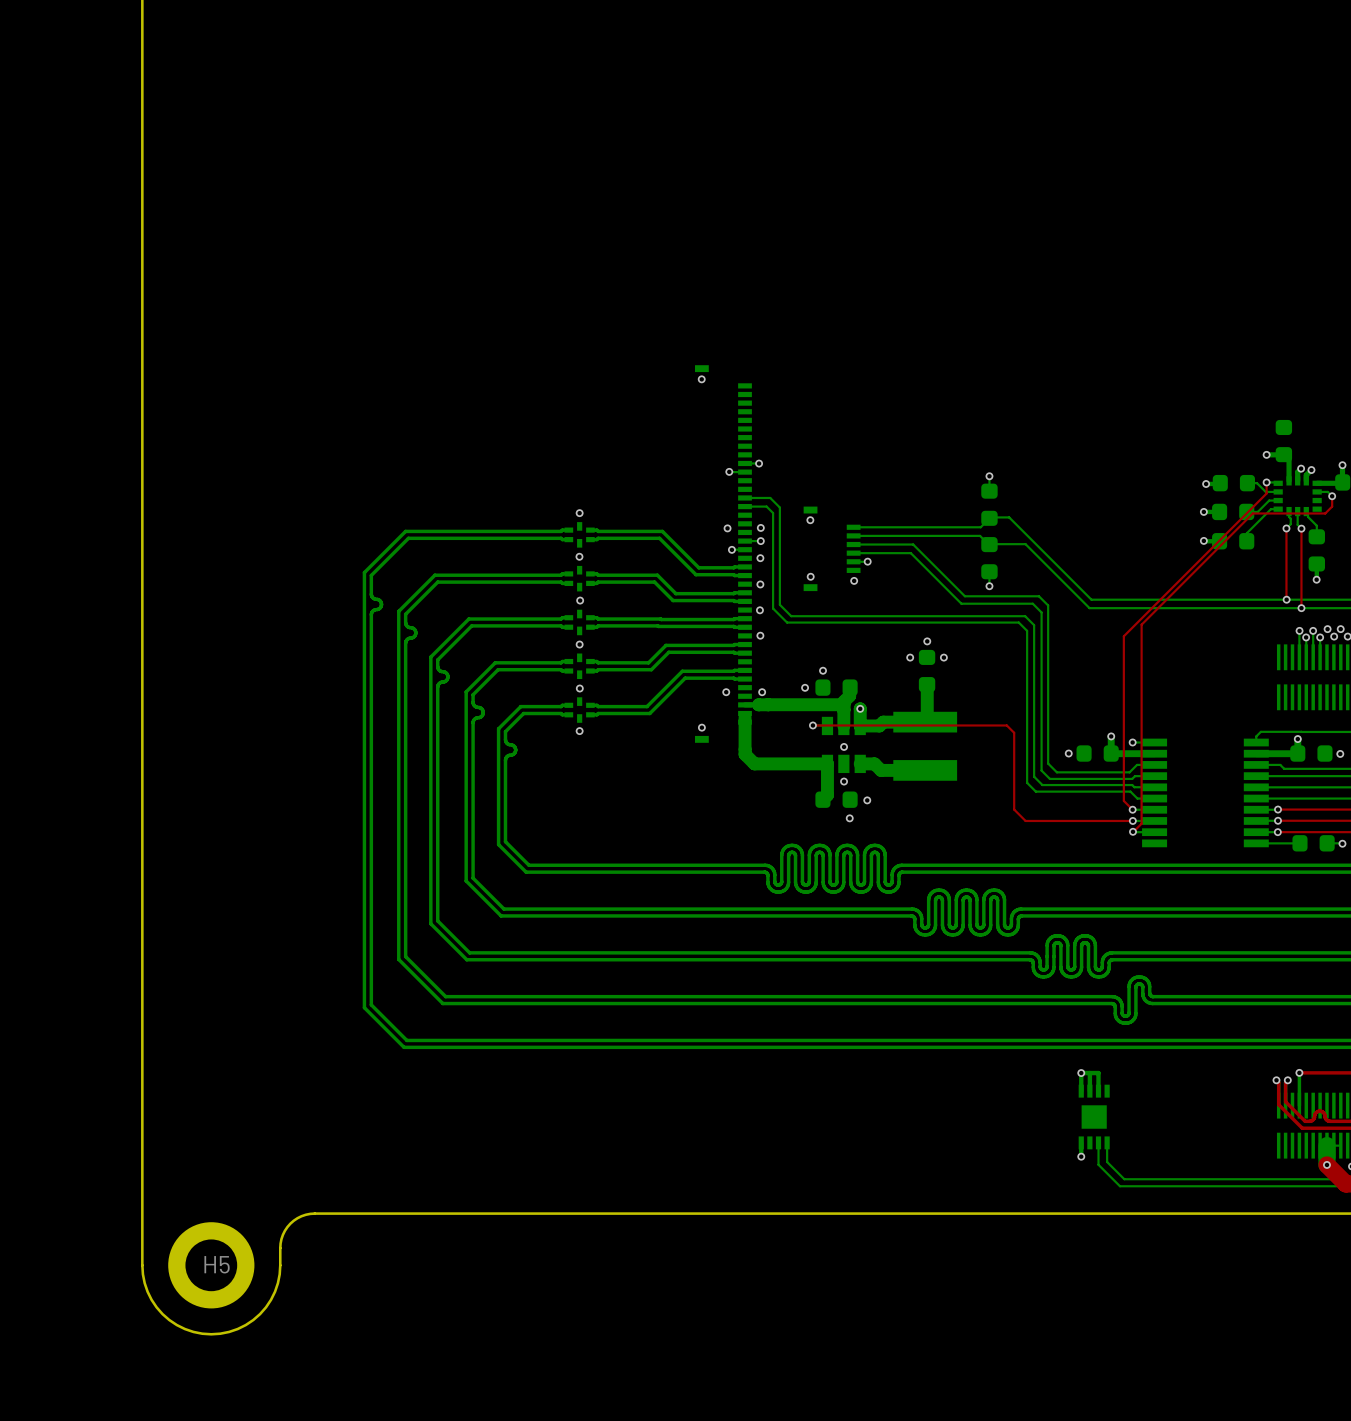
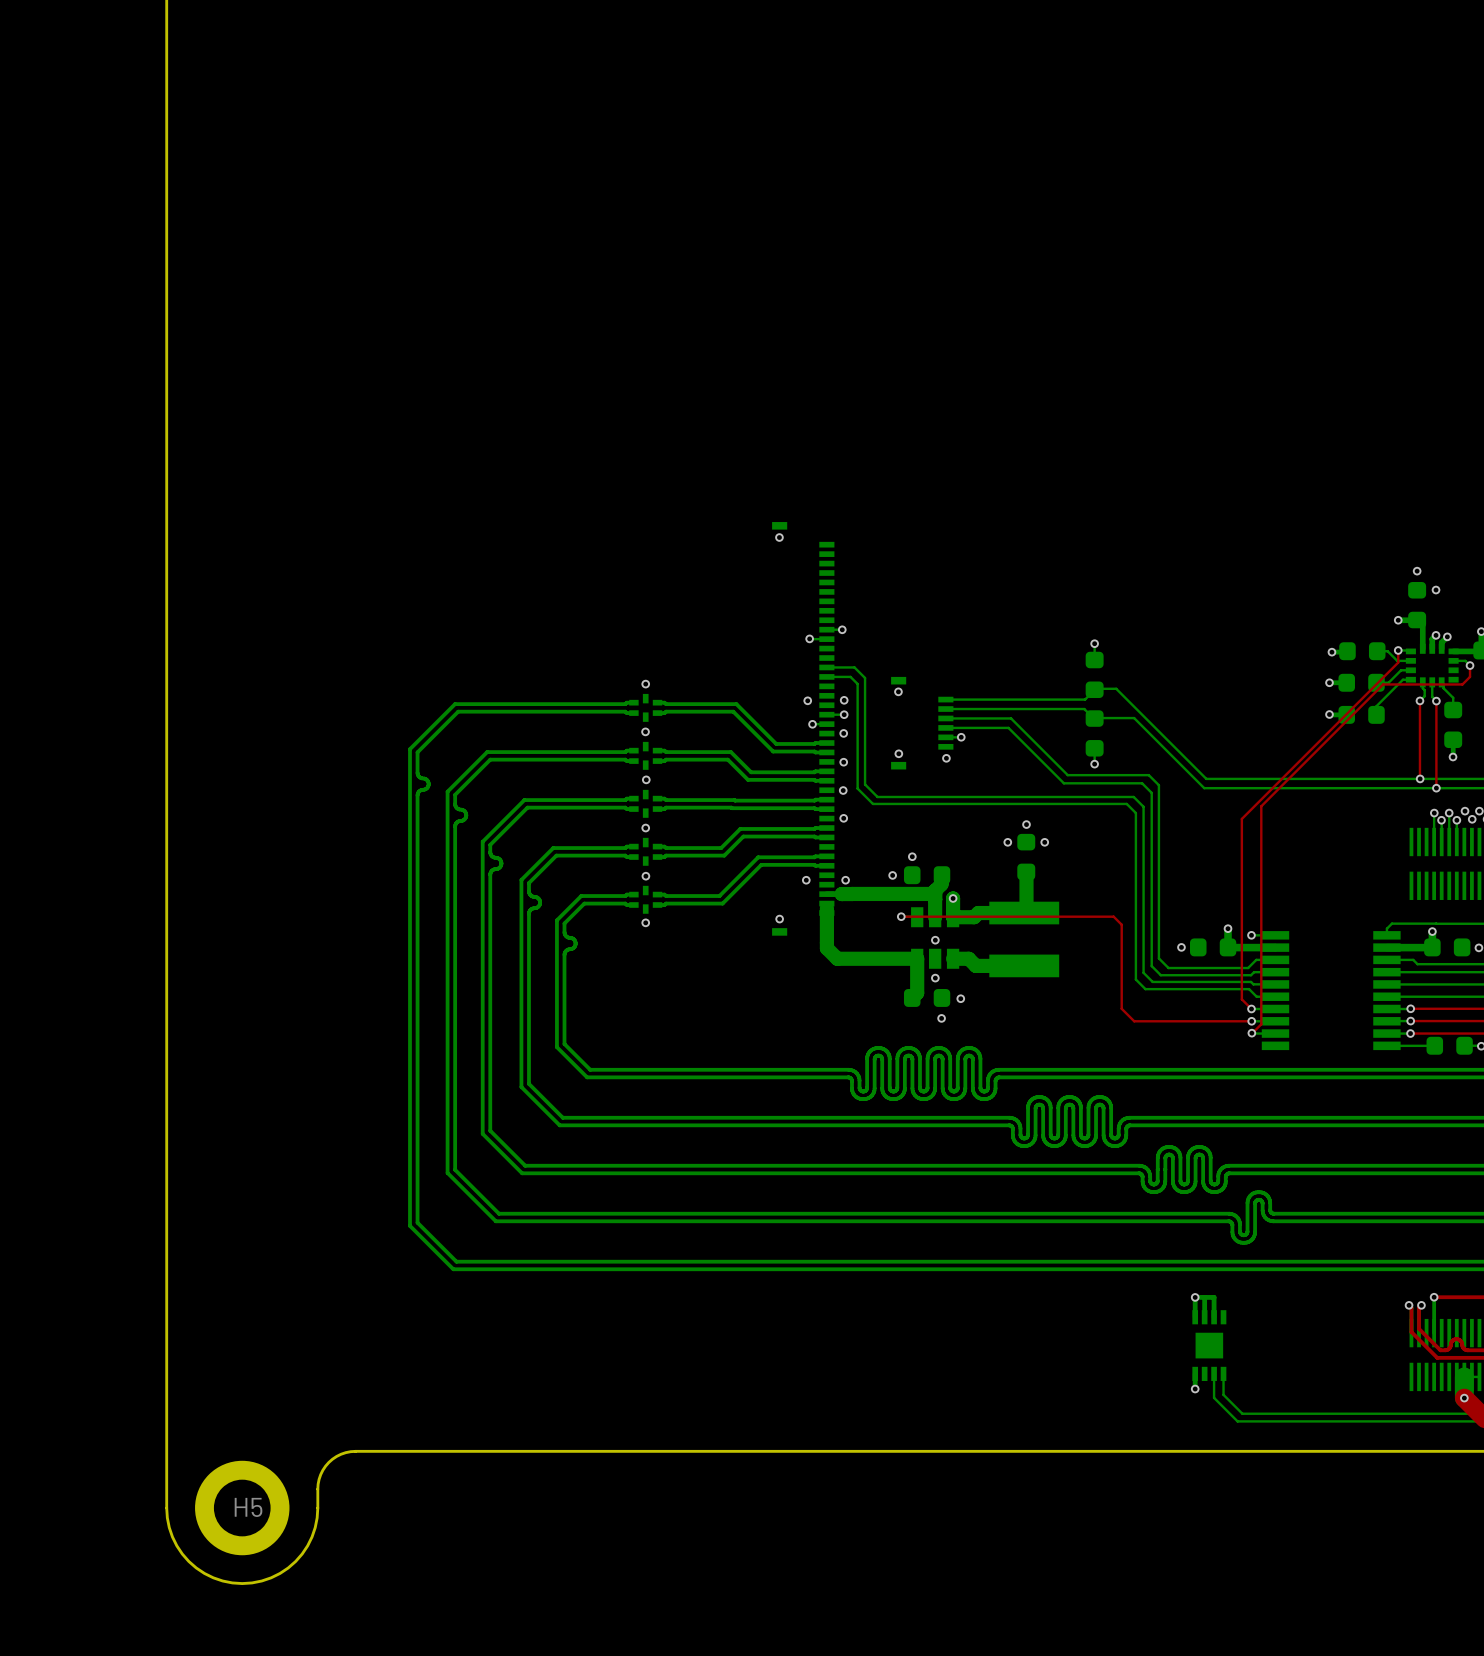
via: none -> (1417, 571)
via: none -> (1436, 590)

